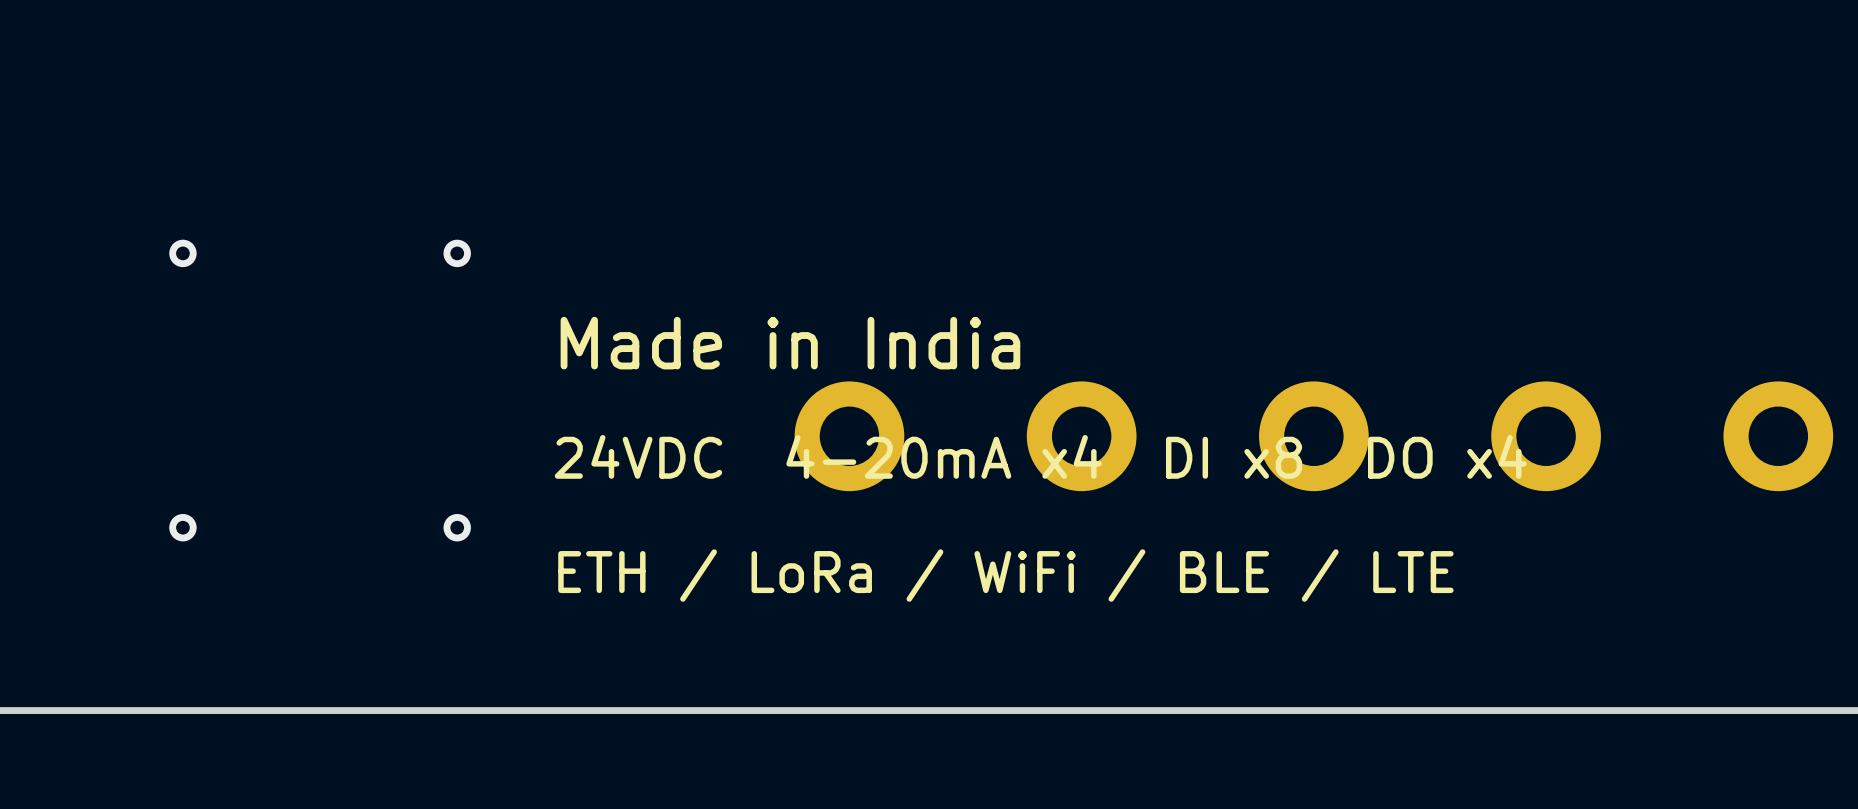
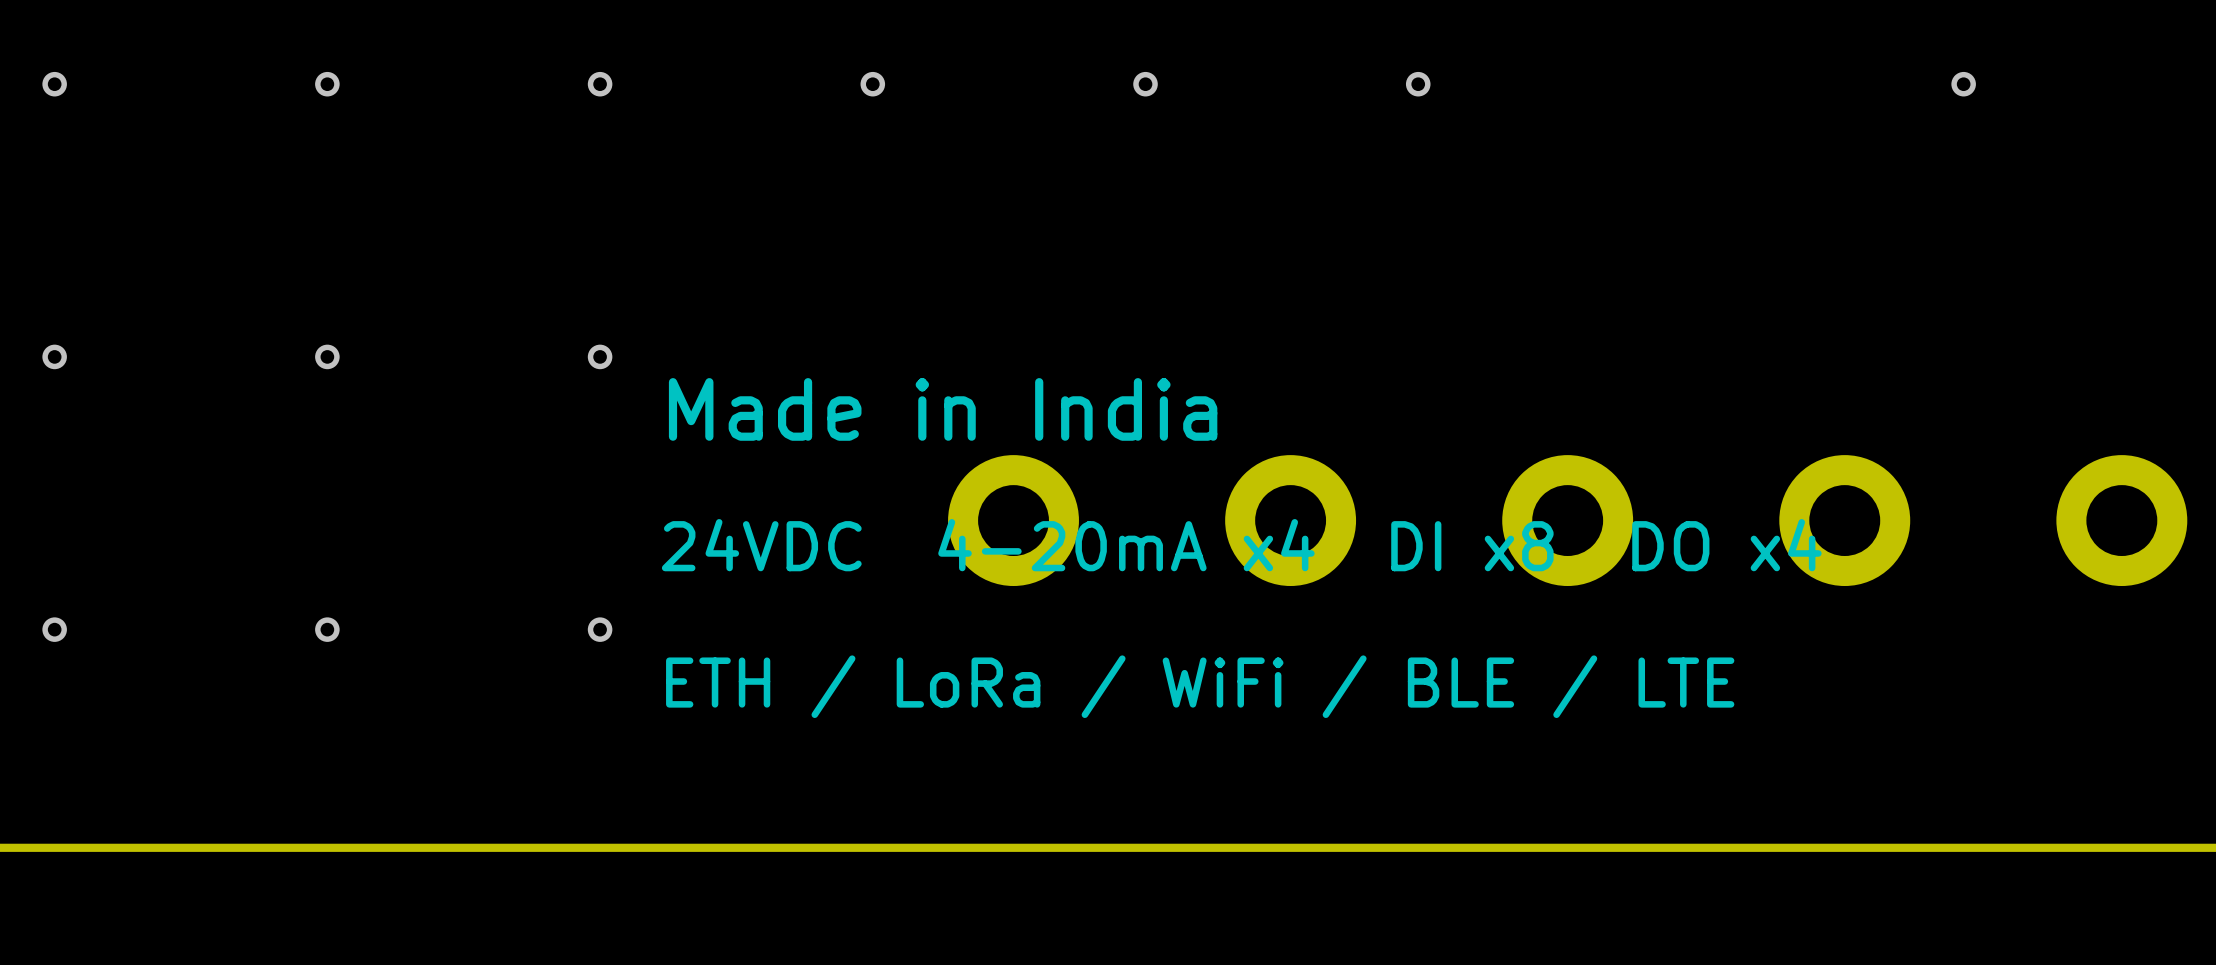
via: none -> (54, 84)
via: none -> (327, 84)
via: none -> (600, 84)
via: none -> (872, 84)
via: none -> (1145, 84)
via: none -> (1418, 84)
via: none -> (1963, 84)
via: (182, 253) -> none
via: (457, 253) -> none
via: none -> (54, 356)
via: none -> (327, 356)
via: none -> (600, 356)
via: none -> (54, 629)
via: (182, 527) -> none
via: none -> (327, 629)
via: (457, 527) -> none
via: none -> (600, 629)

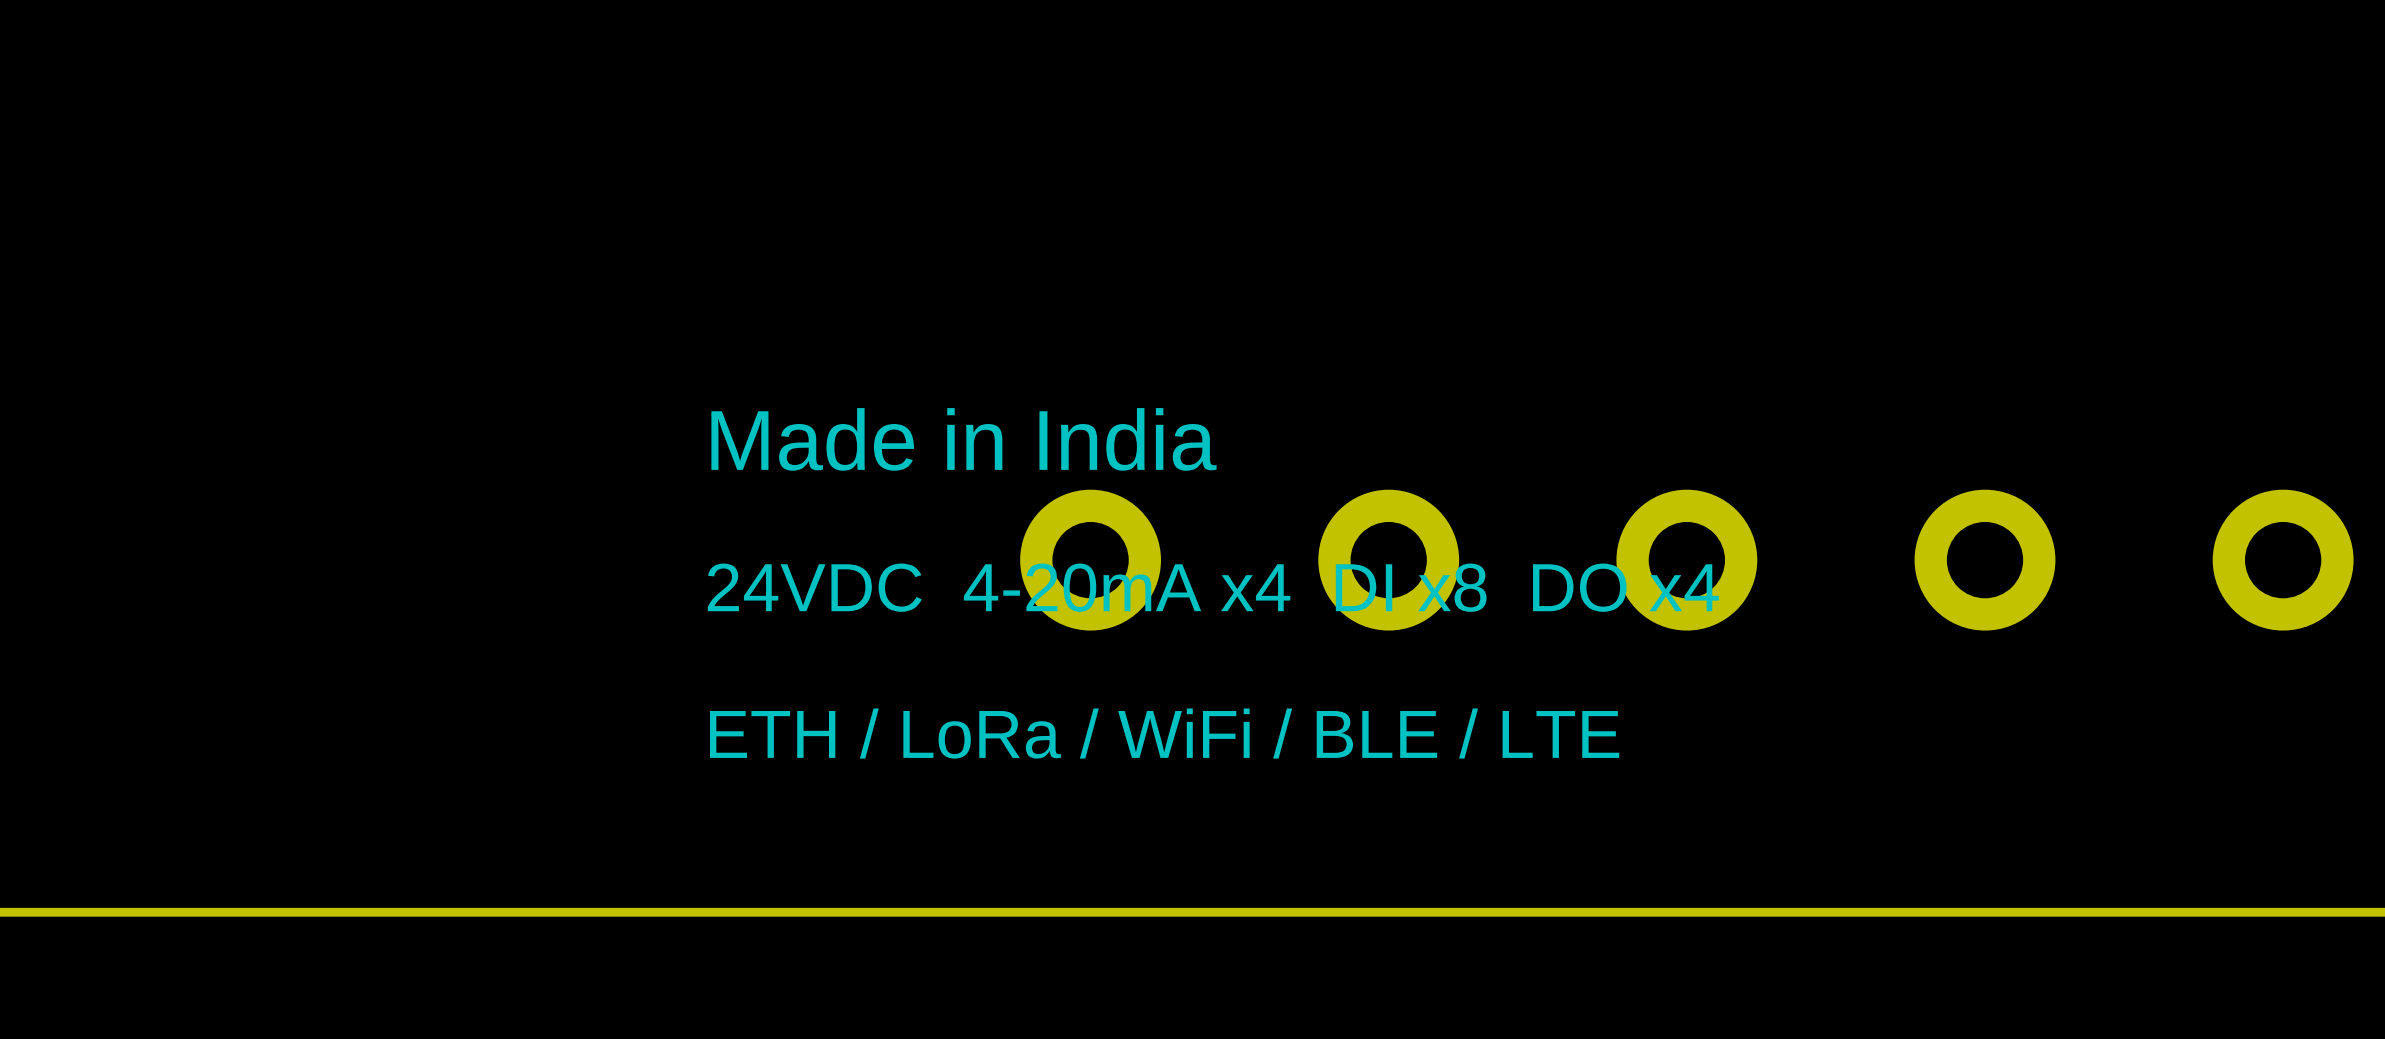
via: (54, 84) -> none
via: (327, 84) -> none
via: (600, 84) -> none
via: (872, 84) -> none
via: (1145, 84) -> none
via: (1418, 84) -> none
via: (1963, 84) -> none
via: (54, 356) -> none
via: (327, 356) -> none
via: (600, 356) -> none
via: (54, 629) -> none
via: (327, 629) -> none
via: (600, 629) -> none

